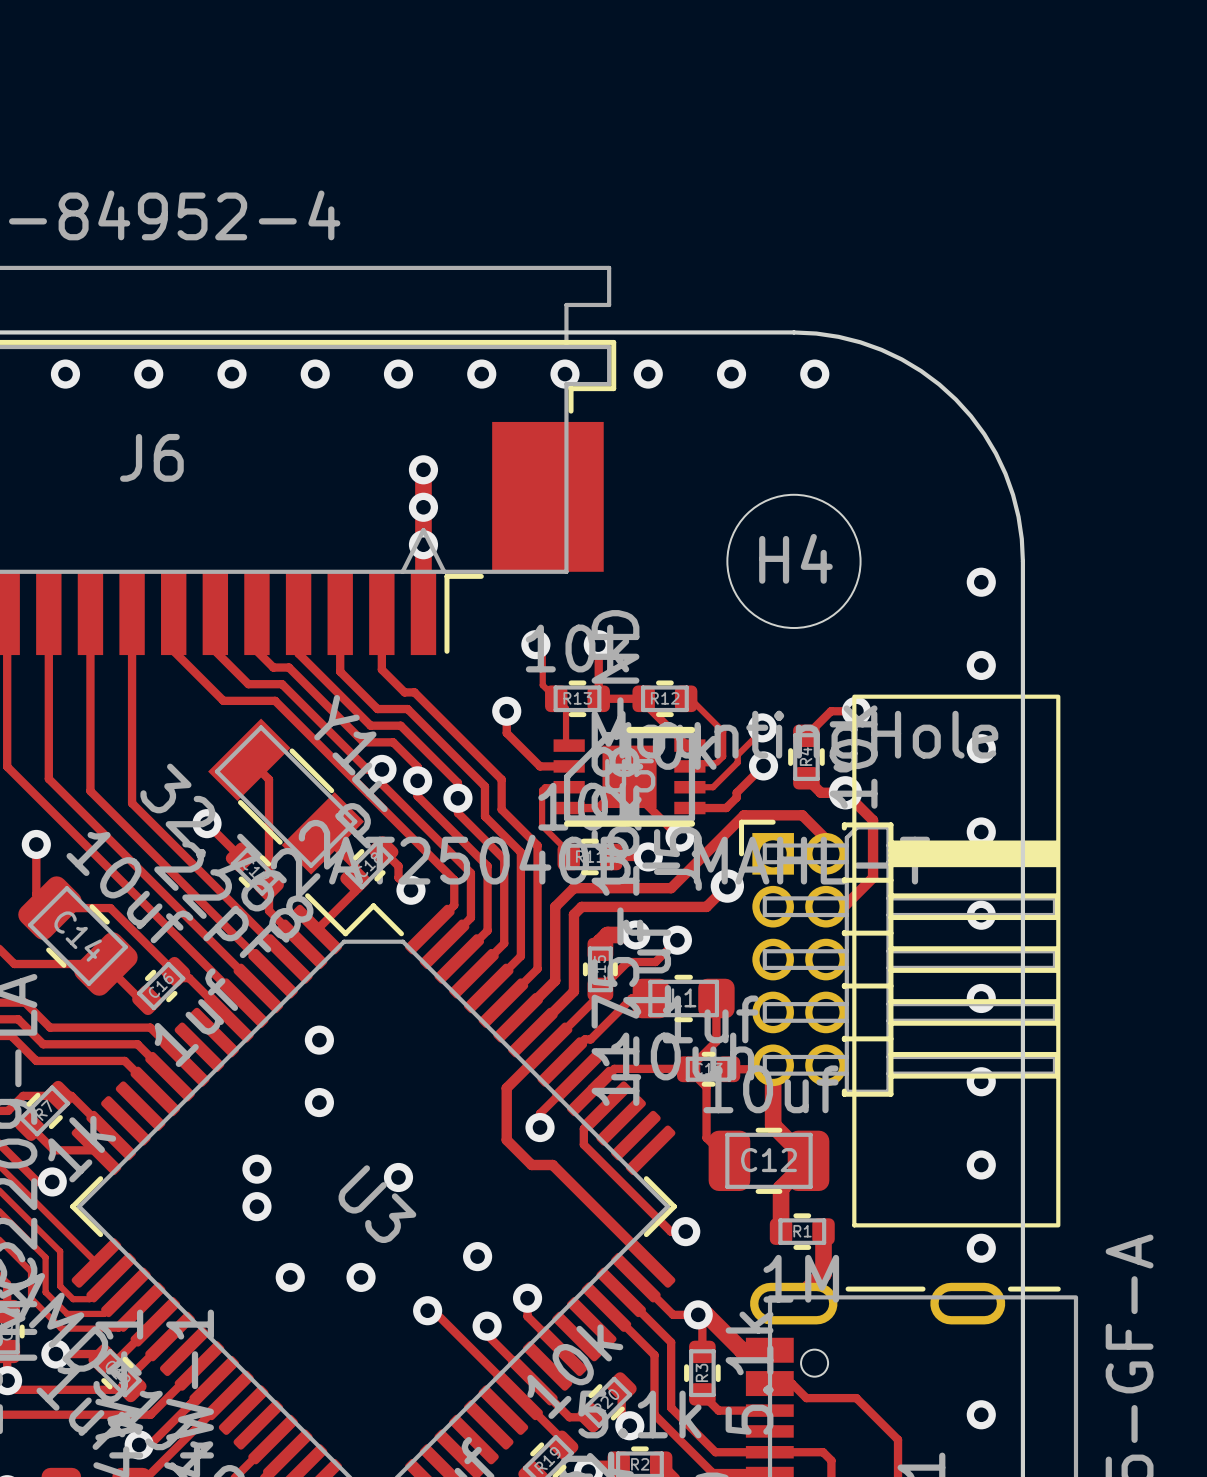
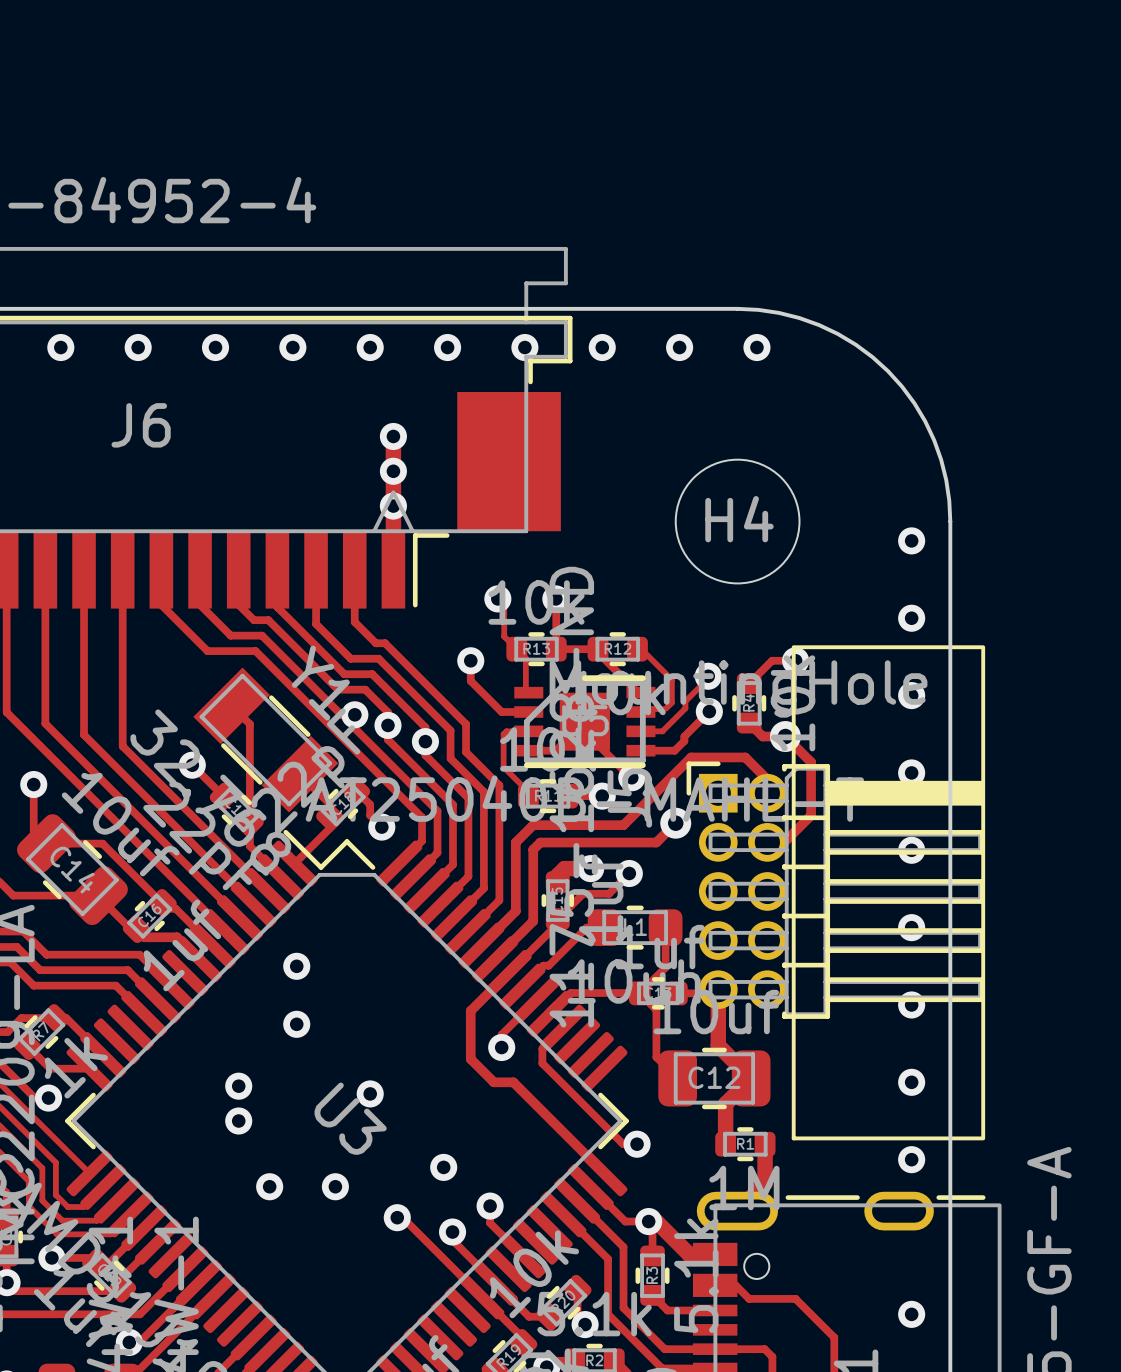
track: none -> (136, 929) (144, 937) (176, 937) (199, 959)

